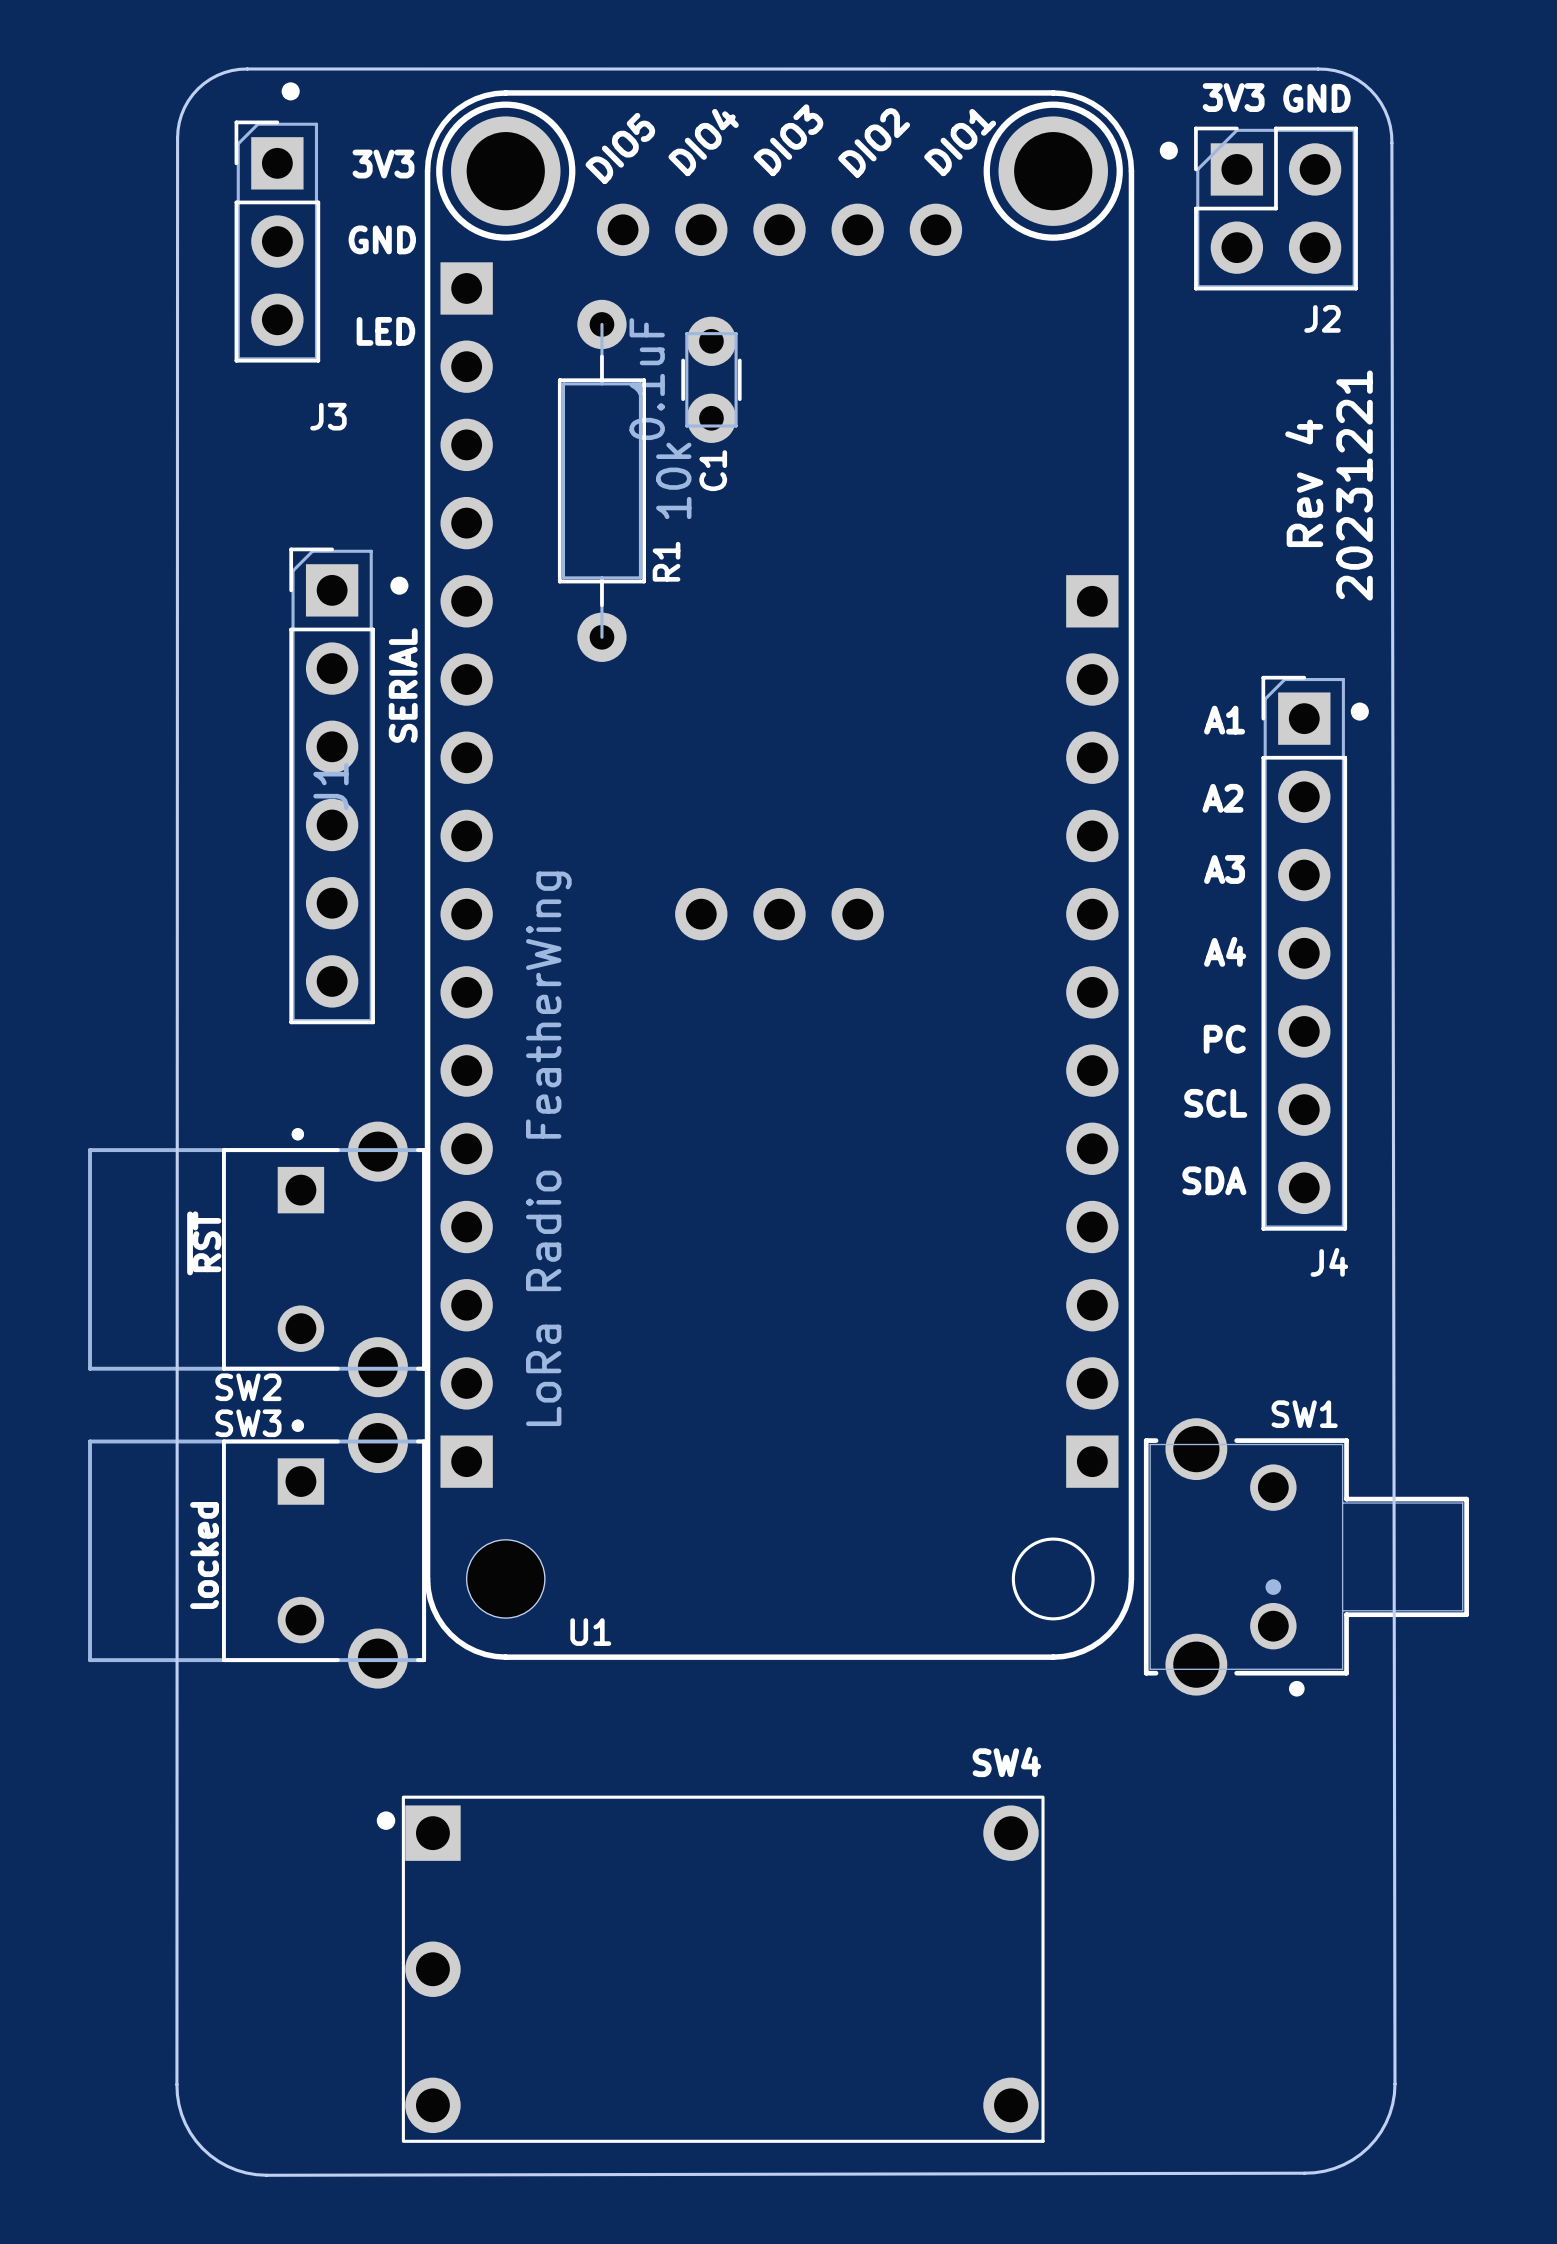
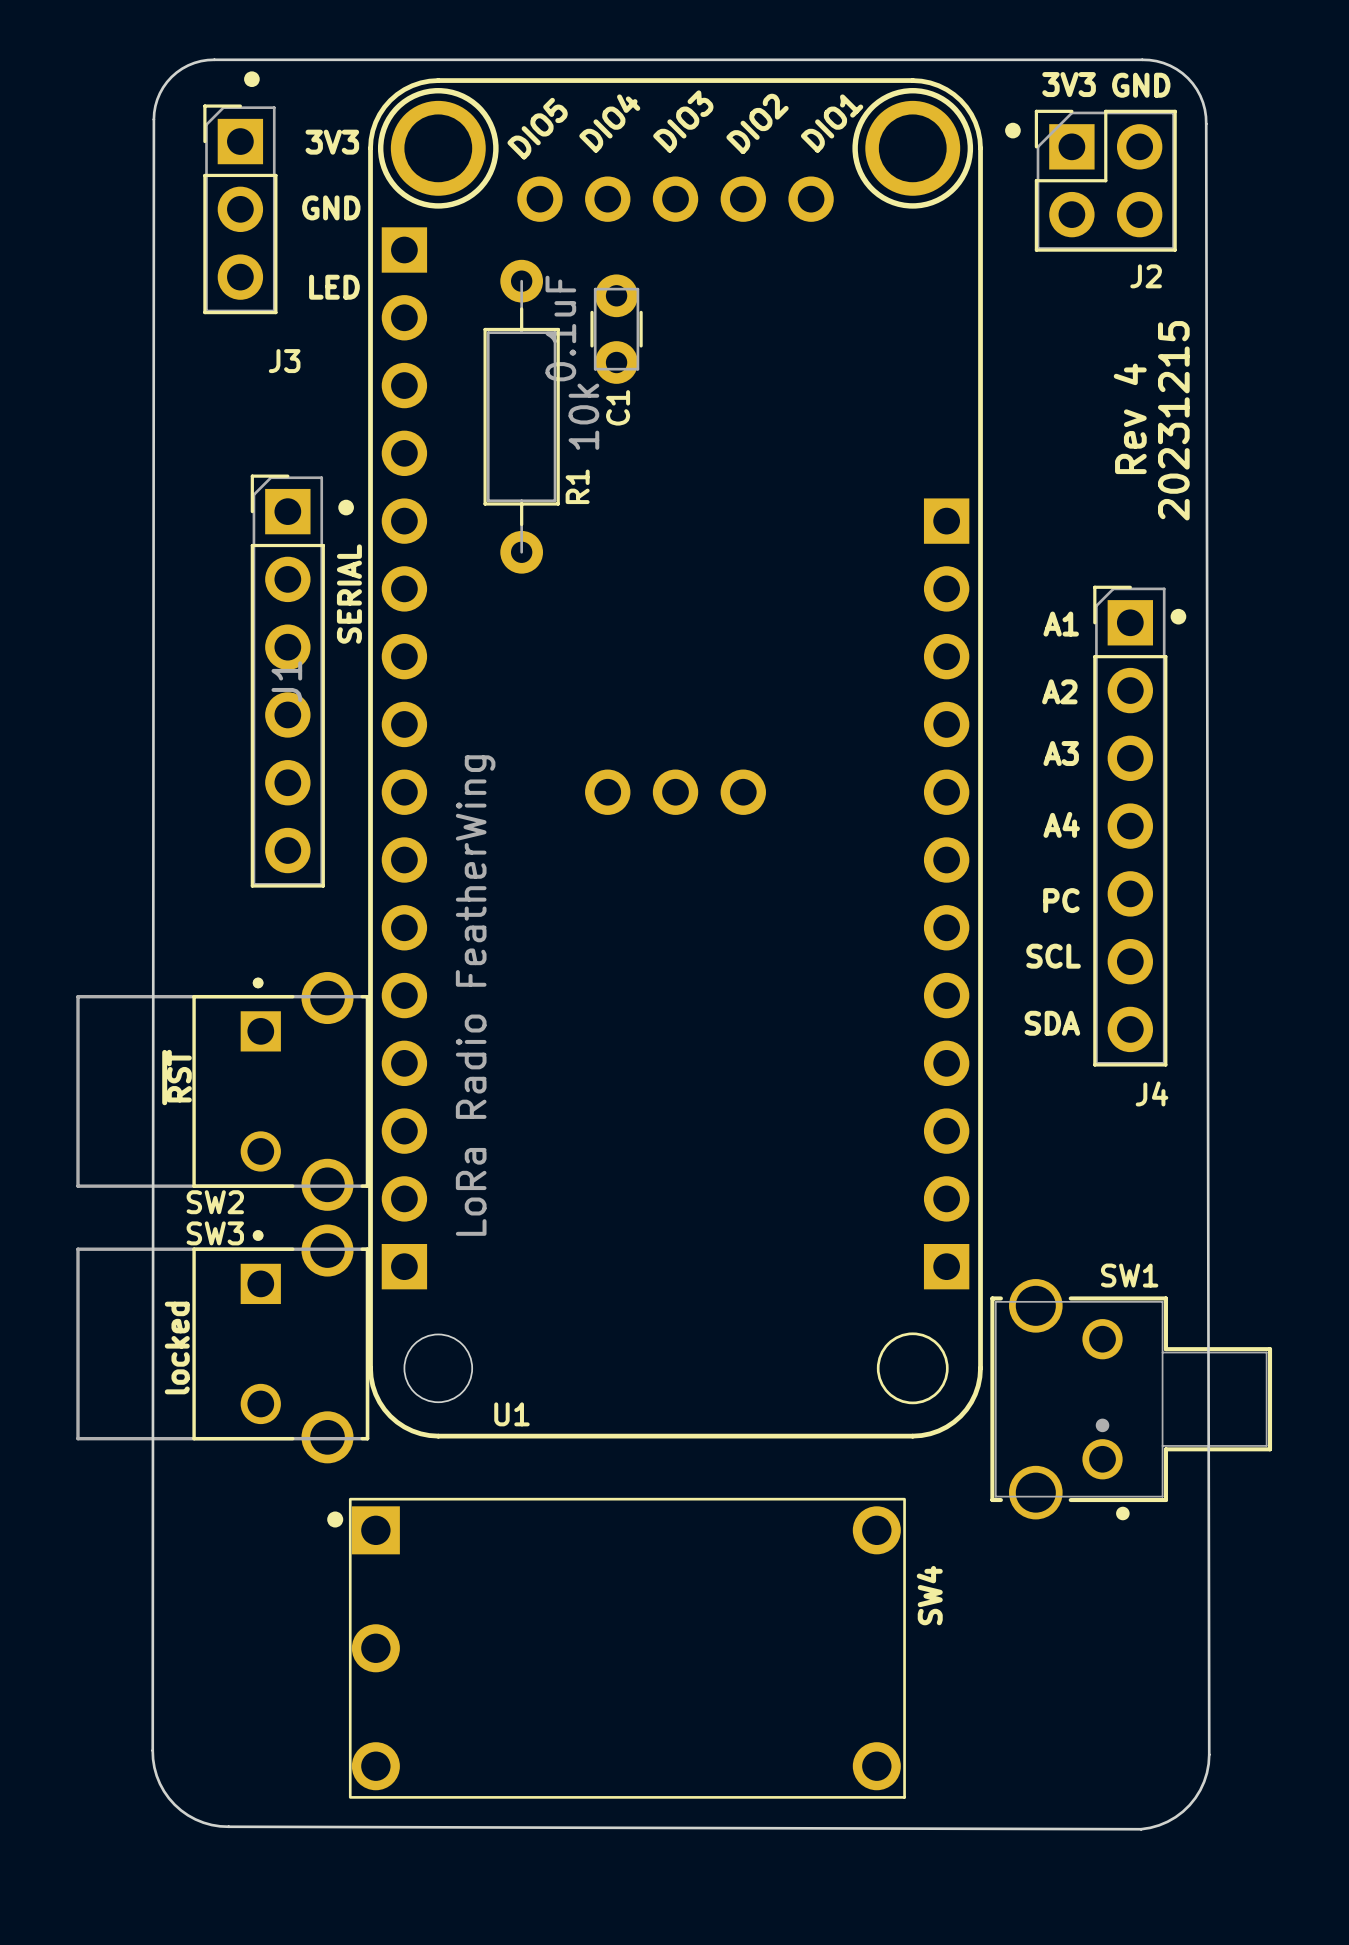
board edge: (177, 137) (177, 2094) (185, 2123) (202, 2148) (218, 2161) (236, 2170) (266, 2175) (1314, 2172) (1334, 2168) (1360, 2154) (1375, 2140) (1386, 2123) (1392, 2104) (1394, 2084) (1391, 143) -> (153, 119) (153, 1759) (159, 1783) (168, 1798) (181, 1810) (203, 1822) (228, 1826) (1141, 1829) (1159, 1825) (1175, 1817) (1189, 1805) (1200, 1790) (1206, 1772) (1209, 1754) (1206, 123)
text: 20231221 (1354, 485) -> 20231215 (1173, 420)
SW1 position: (1306, 1557) -> (1131, 1399)
SW4 name rotation: 0° (1006, 1762) -> 90° counterclockwise (929, 1595)
SW4 name position: SW4 (1006, 1762) -> SW4 (929, 1595)
SW4 position: (710, 1969) -> (616, 1648)

